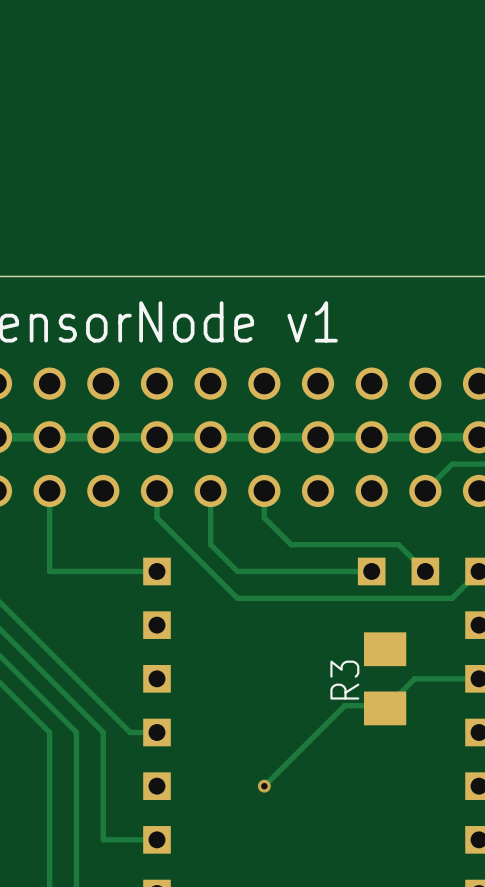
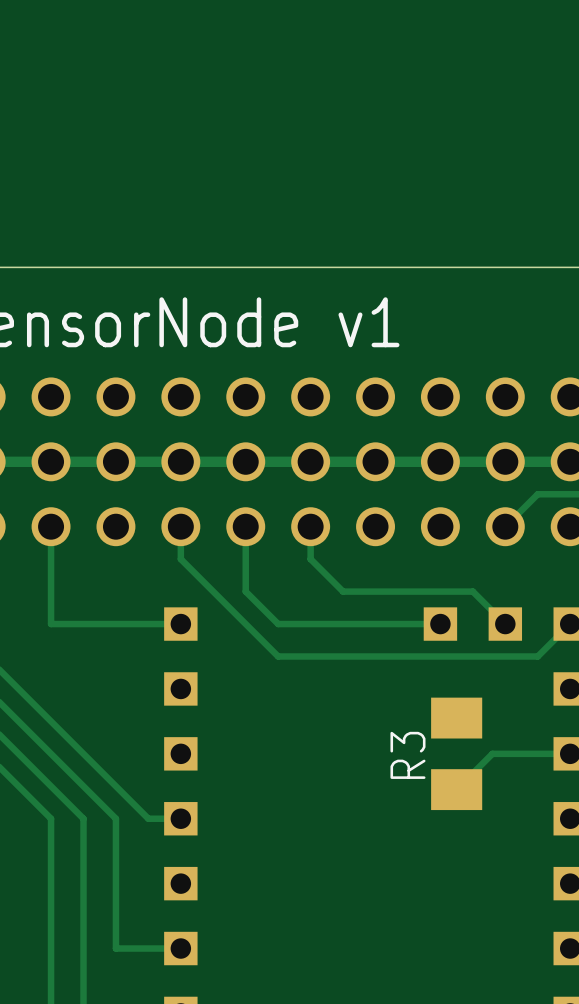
track: (385, 708) (371, 705) (344, 705) (264, 786) -> none
via: (264, 786) -> none

